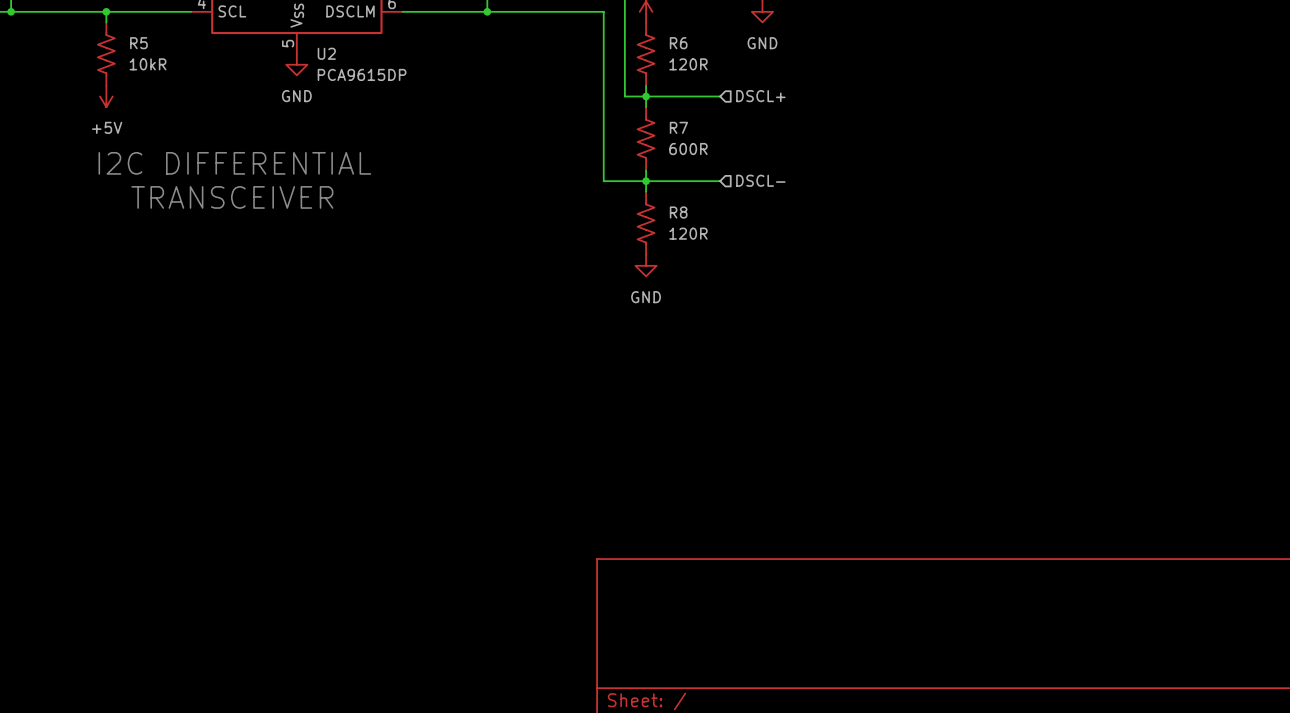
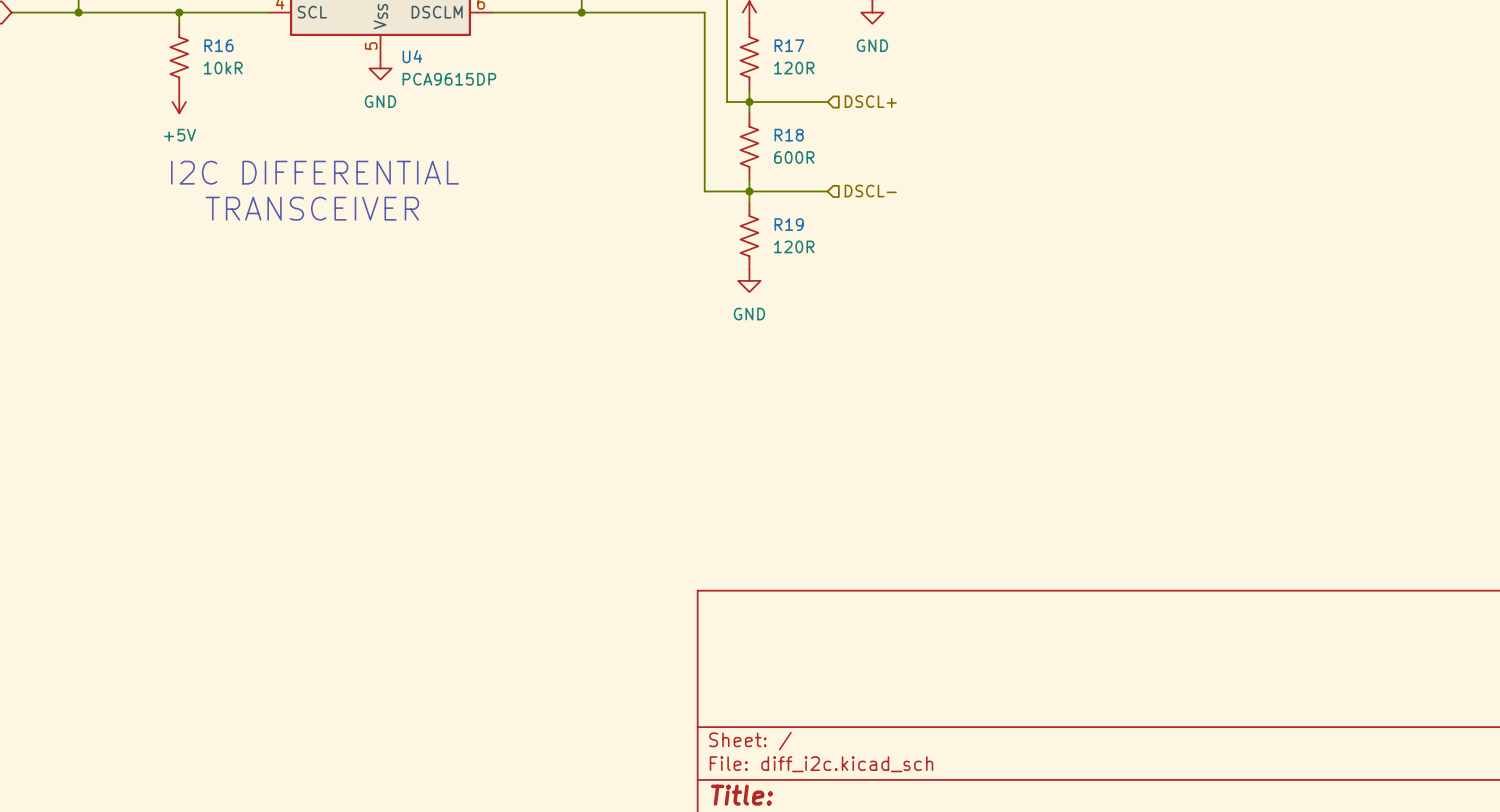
R5 name: R5 (138, 43) -> R16 (219, 45)
R6 name: R6 (678, 43) -> R17 (789, 45)
U2 name: U2 (326, 53) -> U4 (412, 56)
R7 name: R7 (678, 127) -> R18 (789, 135)
R8 name: R8 (678, 212) -> R19 (789, 224)

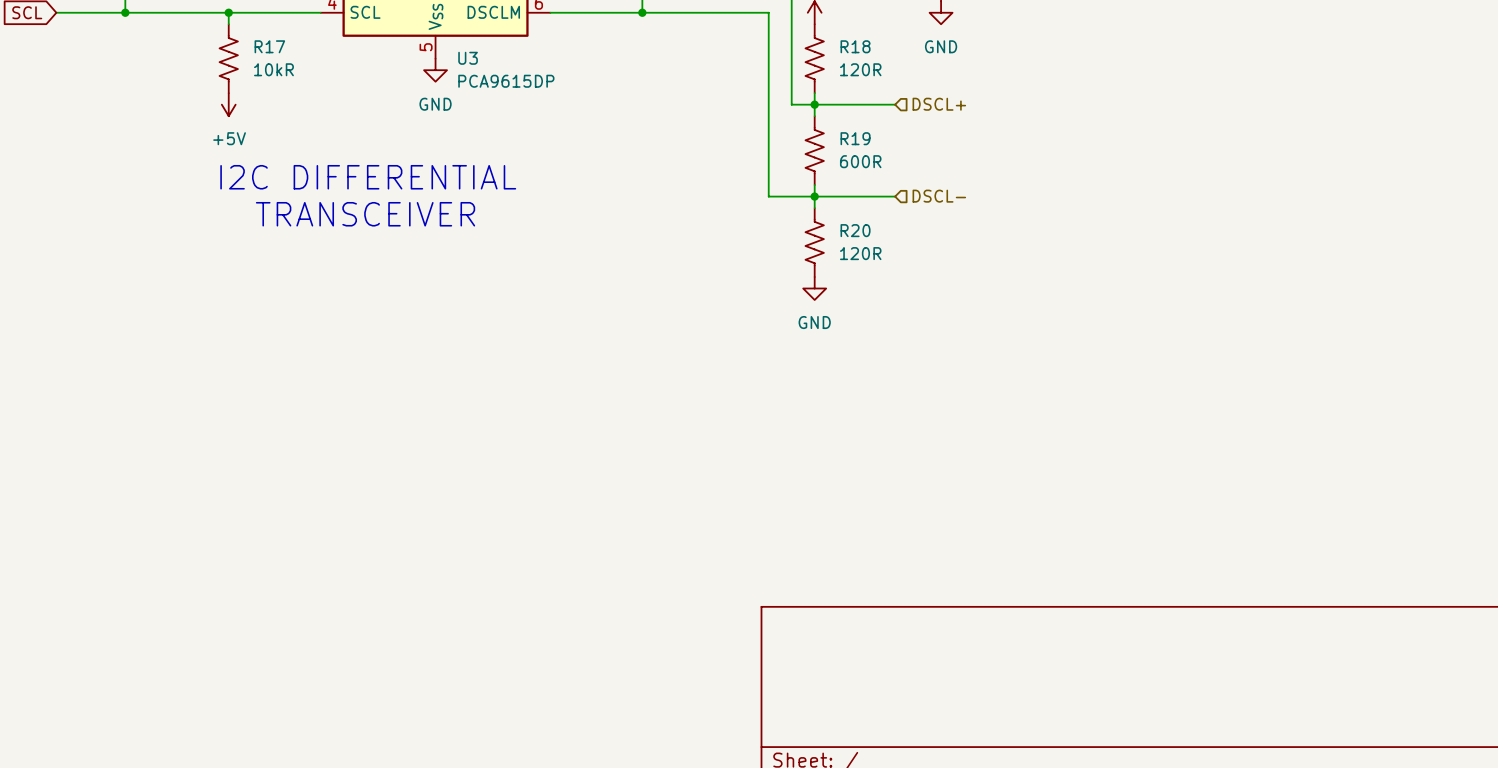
R16 name: R16 (219, 45) -> R17 (269, 46)
R17 name: R17 (789, 45) -> R18 (855, 46)
U4 name: U4 (412, 56) -> U3 (468, 58)
R18 name: R18 (789, 135) -> R19 (855, 138)
R19 name: R19 (789, 224) -> R20 (855, 230)

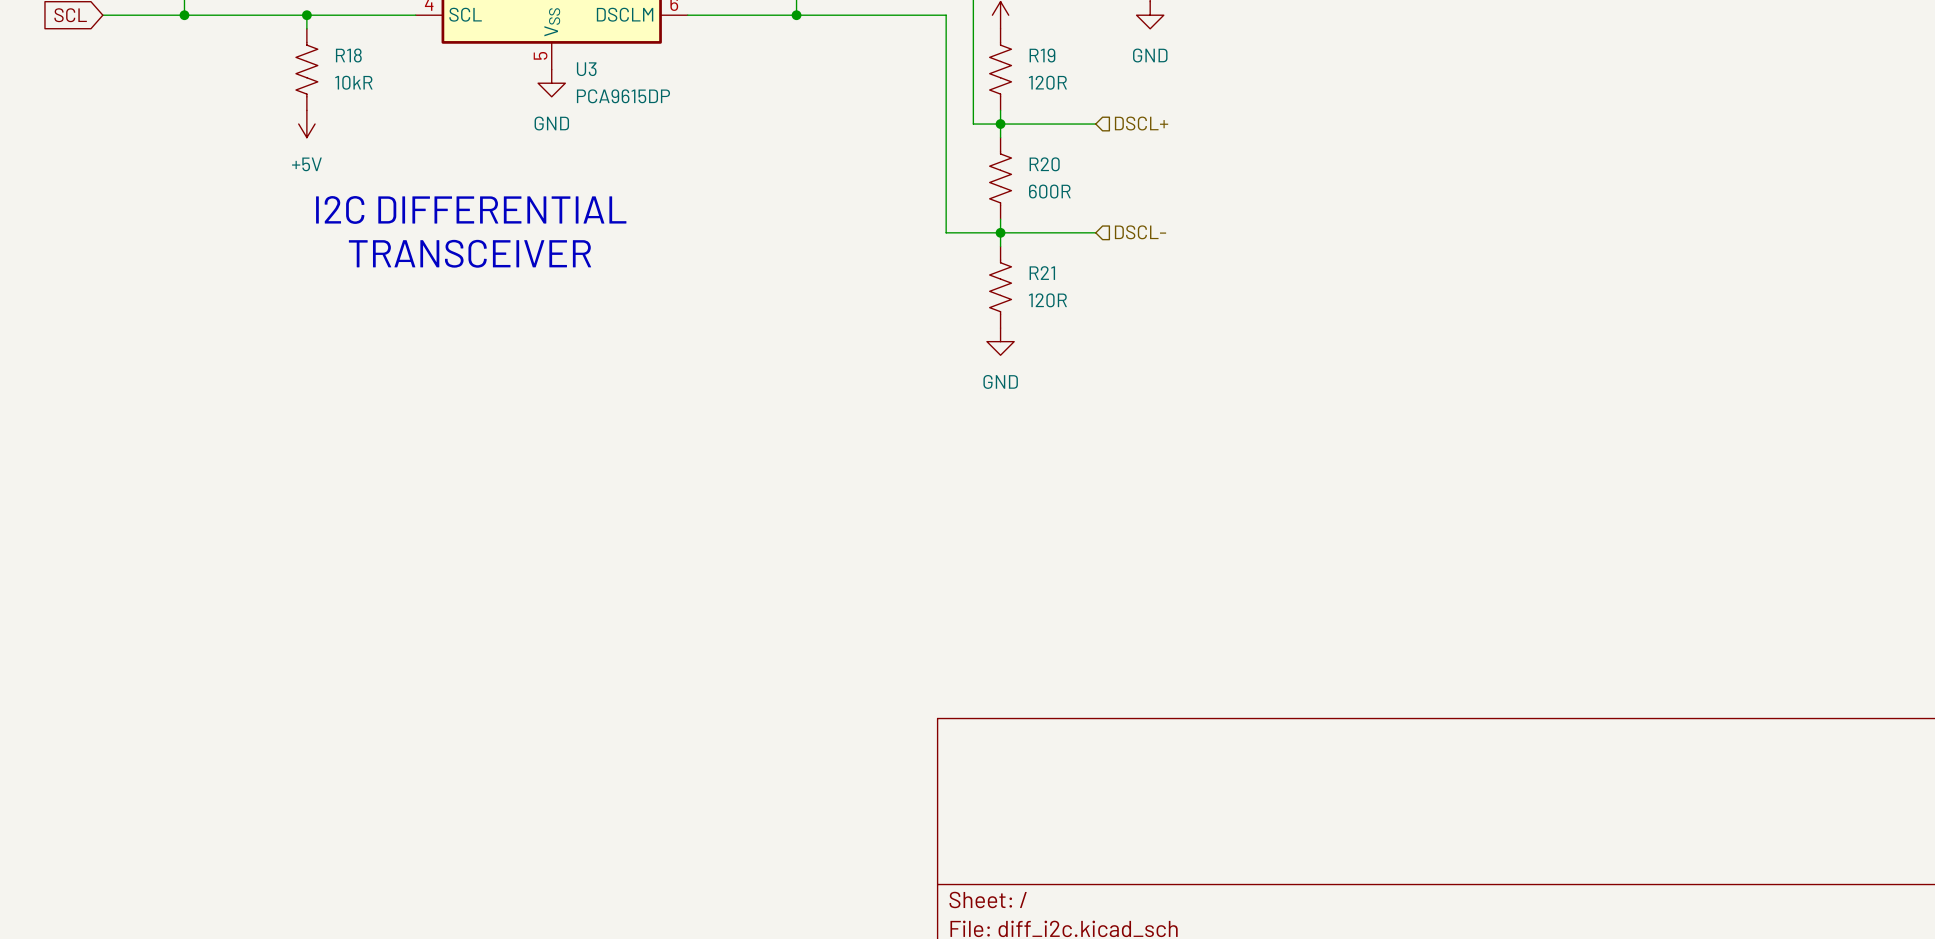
R17 name: R17 (269, 46) -> R18 (348, 55)
R18 name: R18 (855, 46) -> R19 (1042, 55)
R19 name: R19 (855, 138) -> R20 (1044, 164)
R20 name: R20 (855, 230) -> R21 (1042, 273)

